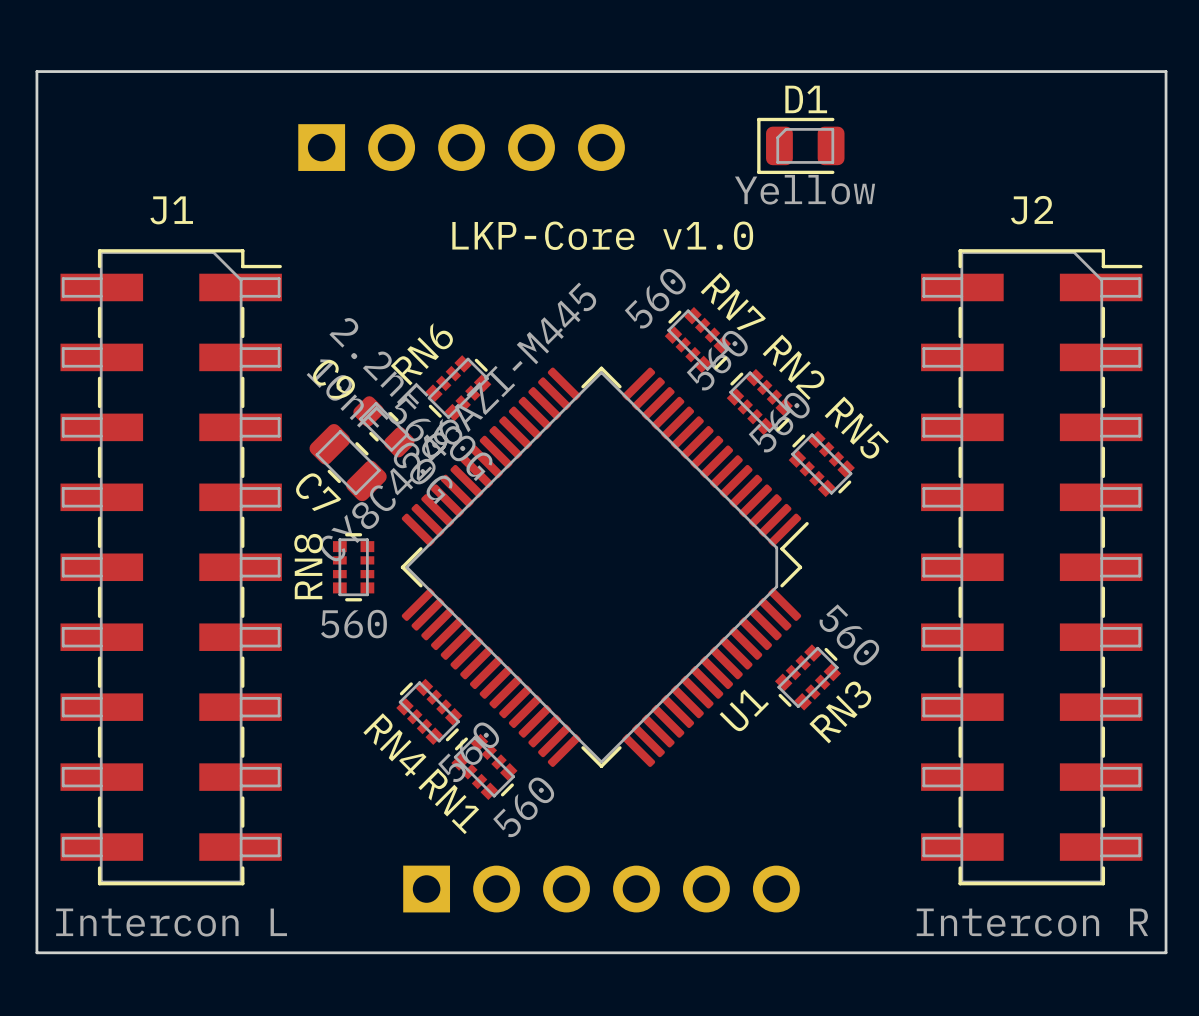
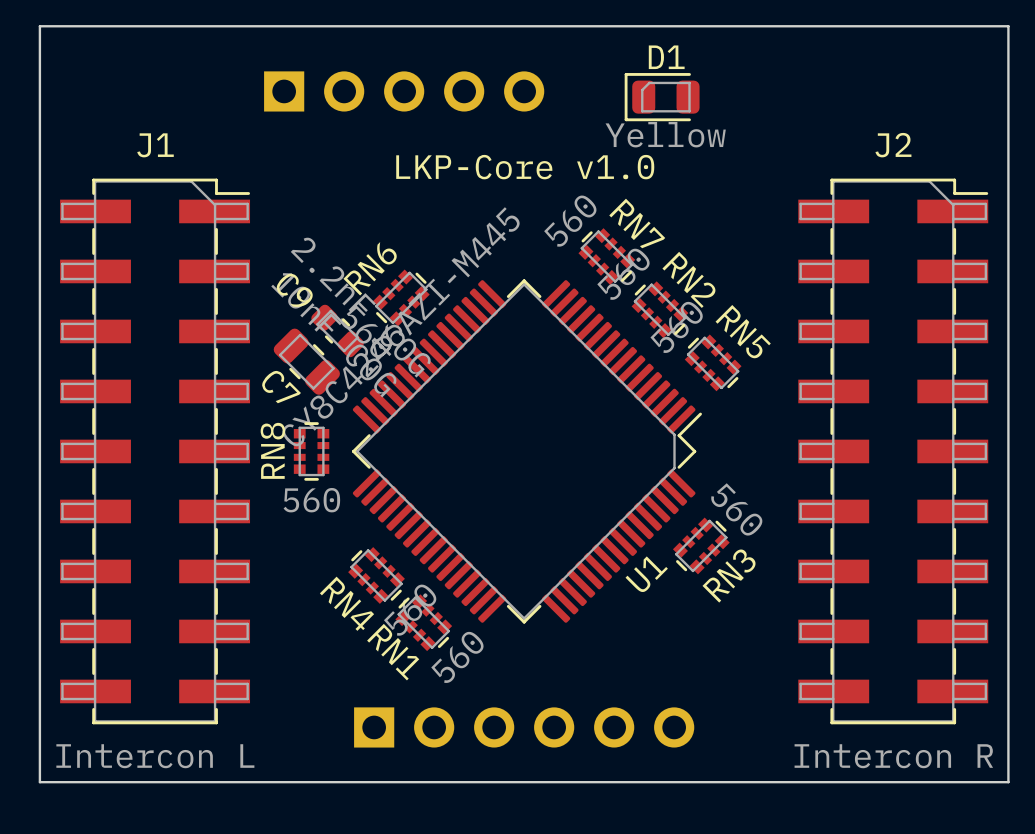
D1 position: (800, 145) -> (662, 97)

